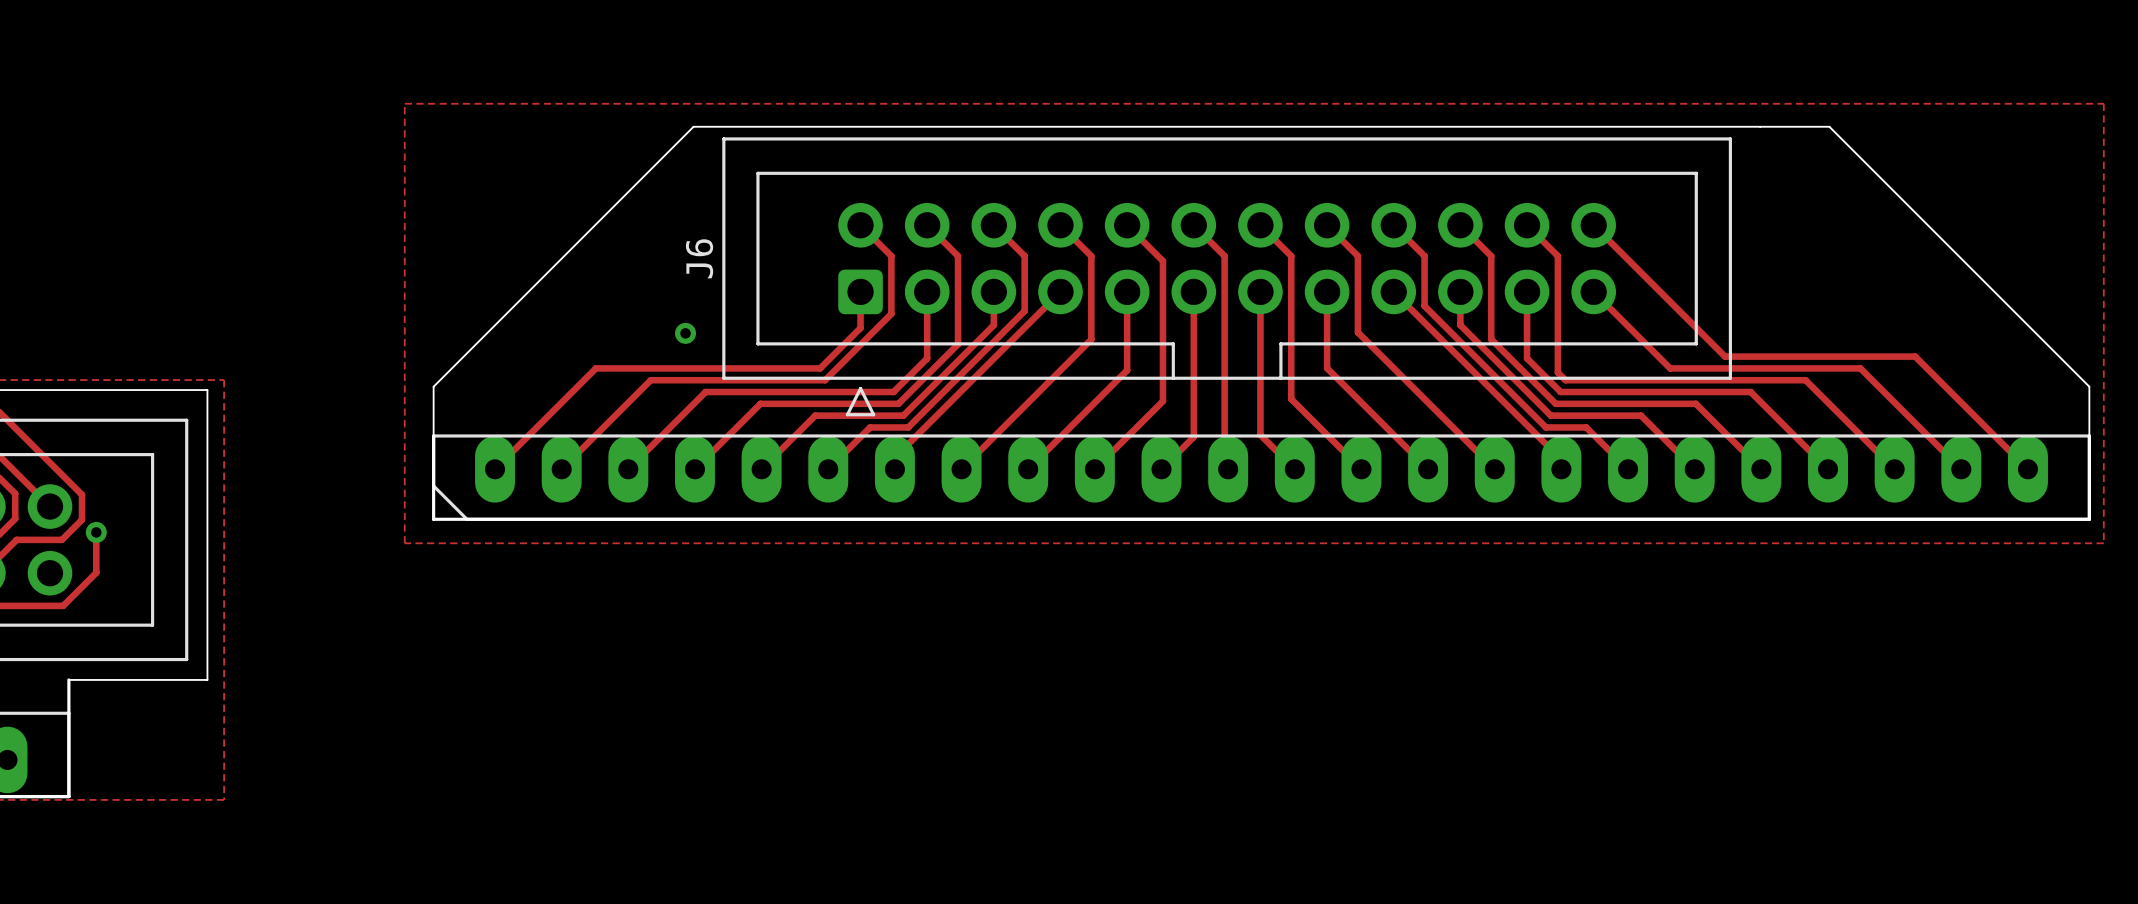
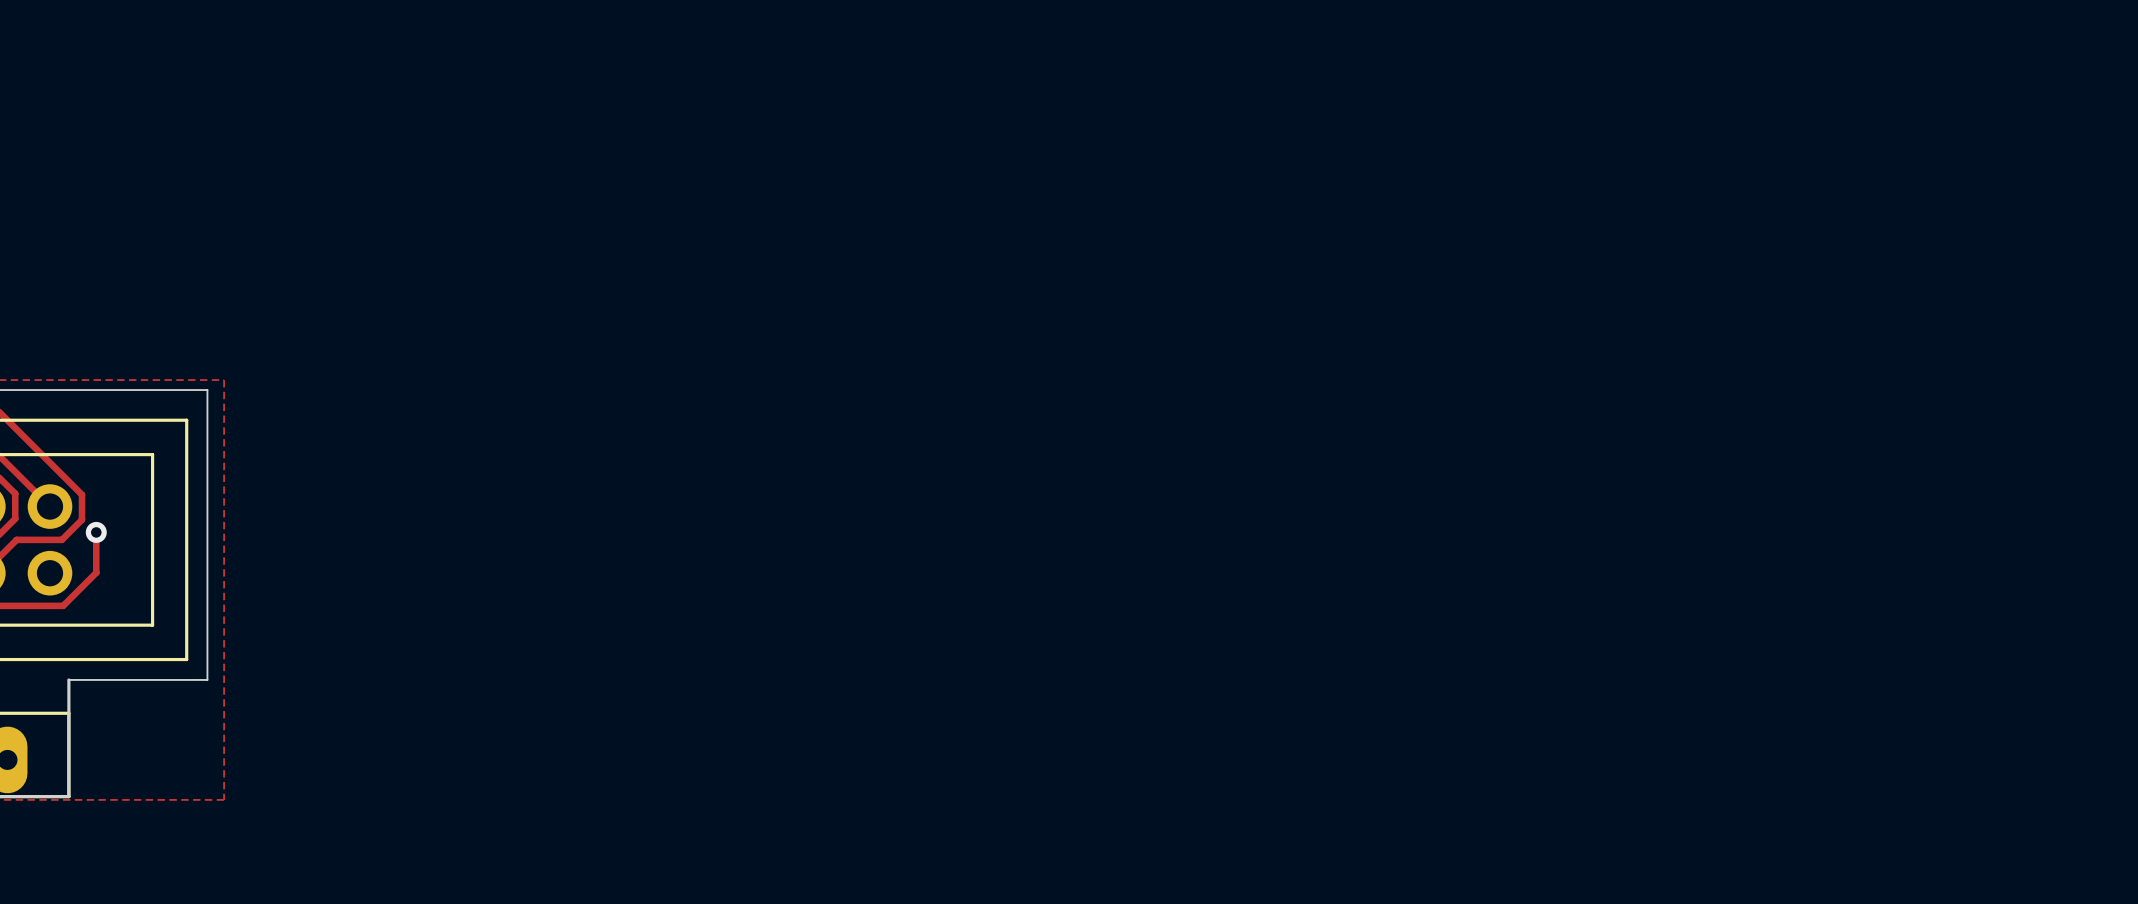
zone outline: (404, 103) (404, 543) (2103, 543) (2103, 103) (404, 103) -> none
track: (860, 225) (891, 256) (891, 313) (825, 380) (650, 380) (561, 469) -> none
track: (927, 225) (958, 256) (958, 344) (898, 403) (760, 403) (694, 469) -> none
track: (993, 225) (1024, 256) (1024, 311) (908, 427) (870, 427) (828, 469) -> none
track: (1060, 225) (1091, 256) (1091, 339) (961, 469) -> none
track: (1127, 225) (1162, 261) (1162, 401) (1094, 469) -> none
track: (1193, 225) (1224, 256) (1224, 465) (1228, 469) -> none
track: (1260, 225) (1291, 256) (1291, 399) (1361, 469) -> none
track: (1327, 225) (1357, 256) (1357, 332) (1494, 469) -> none
track: (1393, 225) (1424, 256) (1424, 306) (1545, 427) (1586, 427) (1628, 469) -> none
track: (1460, 225) (1491, 256) (1491, 339) (1555, 403) (1695, 403) (1761, 469) -> none
track: (1527, 225) (1557, 256) (1557, 372) (1565, 380) (1805, 380) (1894, 469) -> none
track: (1593, 225) (1725, 356) (1915, 356) (2027, 469) -> none
J6: (1227, 276) -> none
track: (860, 291) (860, 328) (820, 368) (595, 368) (495, 469) -> none
track: (927, 291) (927, 358) (893, 392) (705, 392) (628, 469) -> none
track: (993, 291) (993, 325) (903, 415) (815, 415) (761, 469) -> none
track: (1060, 291) (894, 457) (894, 469) -> none
track: (1127, 291) (1127, 370) (1028, 469) -> none
track: (1193, 291) (1193, 437) (1161, 469) -> none
track: (1260, 291) (1260, 434) (1294, 469) -> none
track: (1327, 291) (1327, 368) (1428, 469) -> none
track: (1393, 291) (1561, 459) (1561, 469) -> none
track: (1460, 291) (1460, 325) (1550, 415) (1641, 415) (1694, 469) -> none
track: (1527, 291) (1527, 358) (1560, 392) (1750, 392) (1828, 469) -> none
track: (1593, 291) (1670, 368) (1860, 368) (1961, 469) -> none
via: (685, 333) -> none
board edge: (433, 435) (433, 386) (693, 126) (1829, 126) (2089, 386) (2089, 435) -> none
part: (1261, 477) -> none

